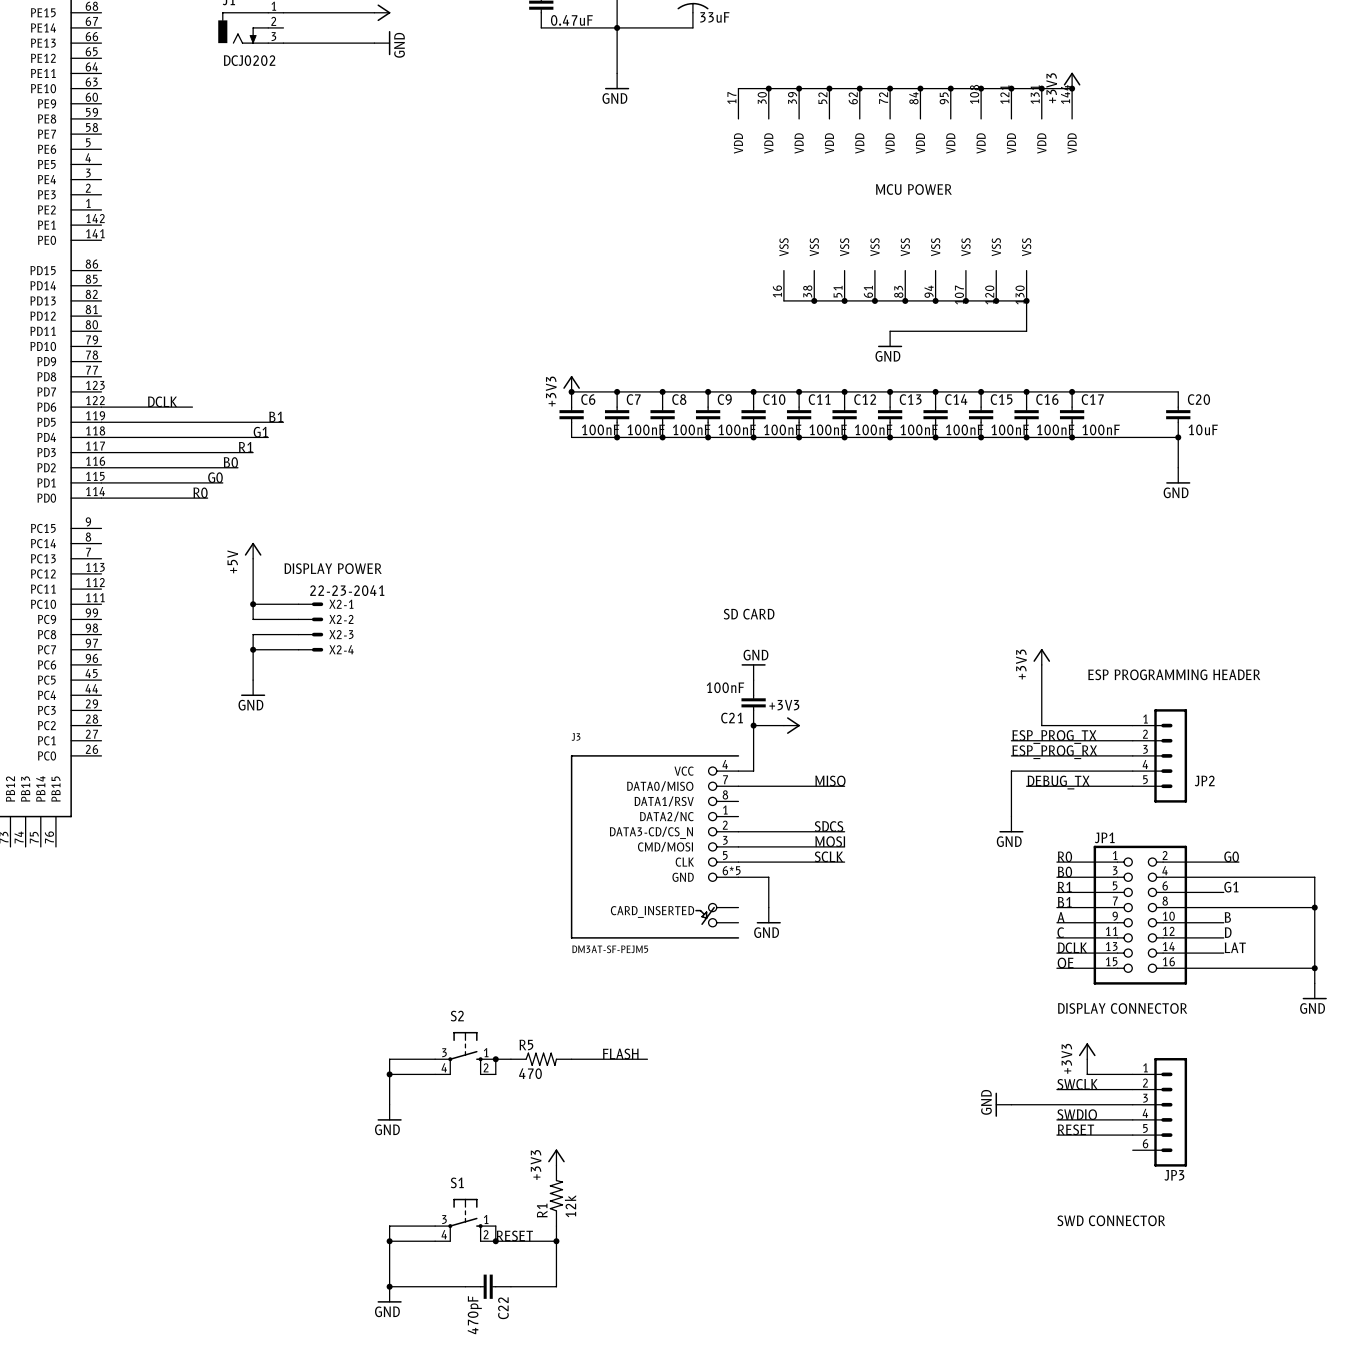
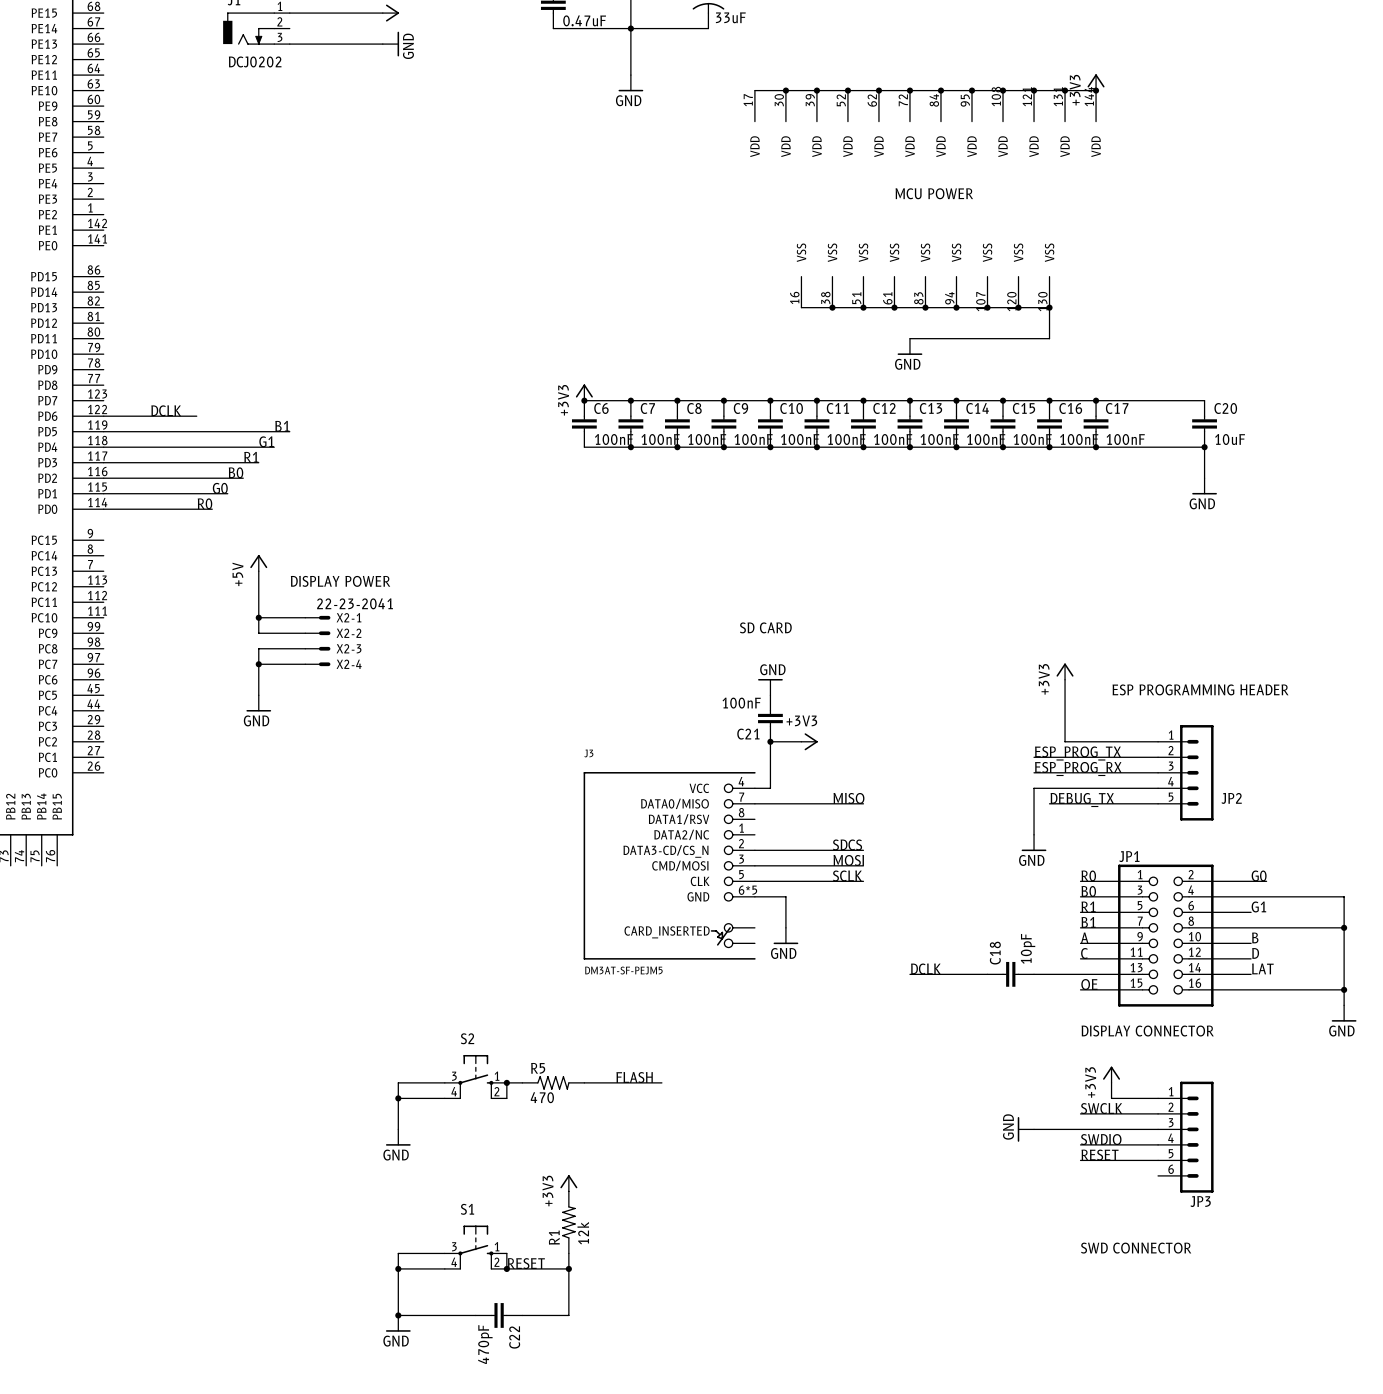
label: none -> DCLK (925, 968)
label: DCLK (1072, 947) -> none
wire: none -> (909, 974) (987, 974)
C18: none -> 10pF (1010, 974)
wire: none -> (1034, 974) (1080, 974)

